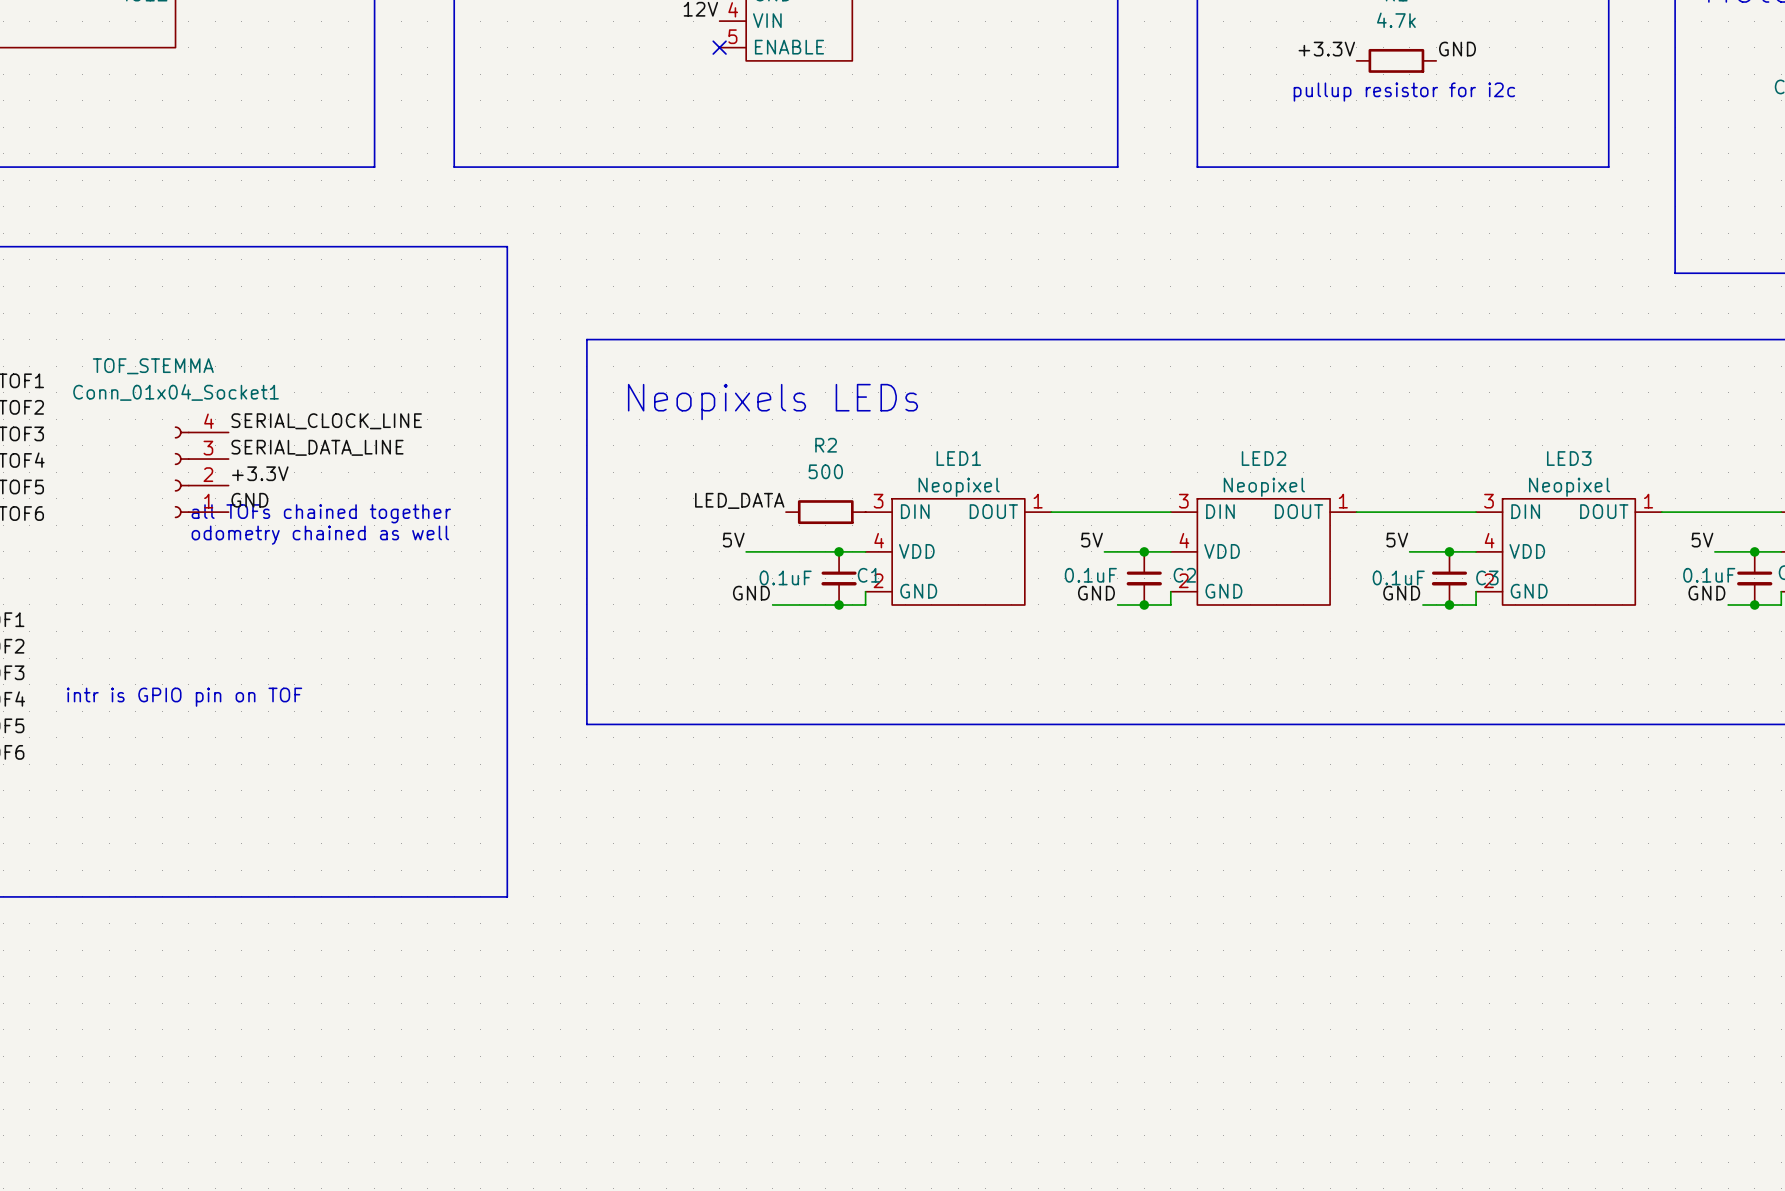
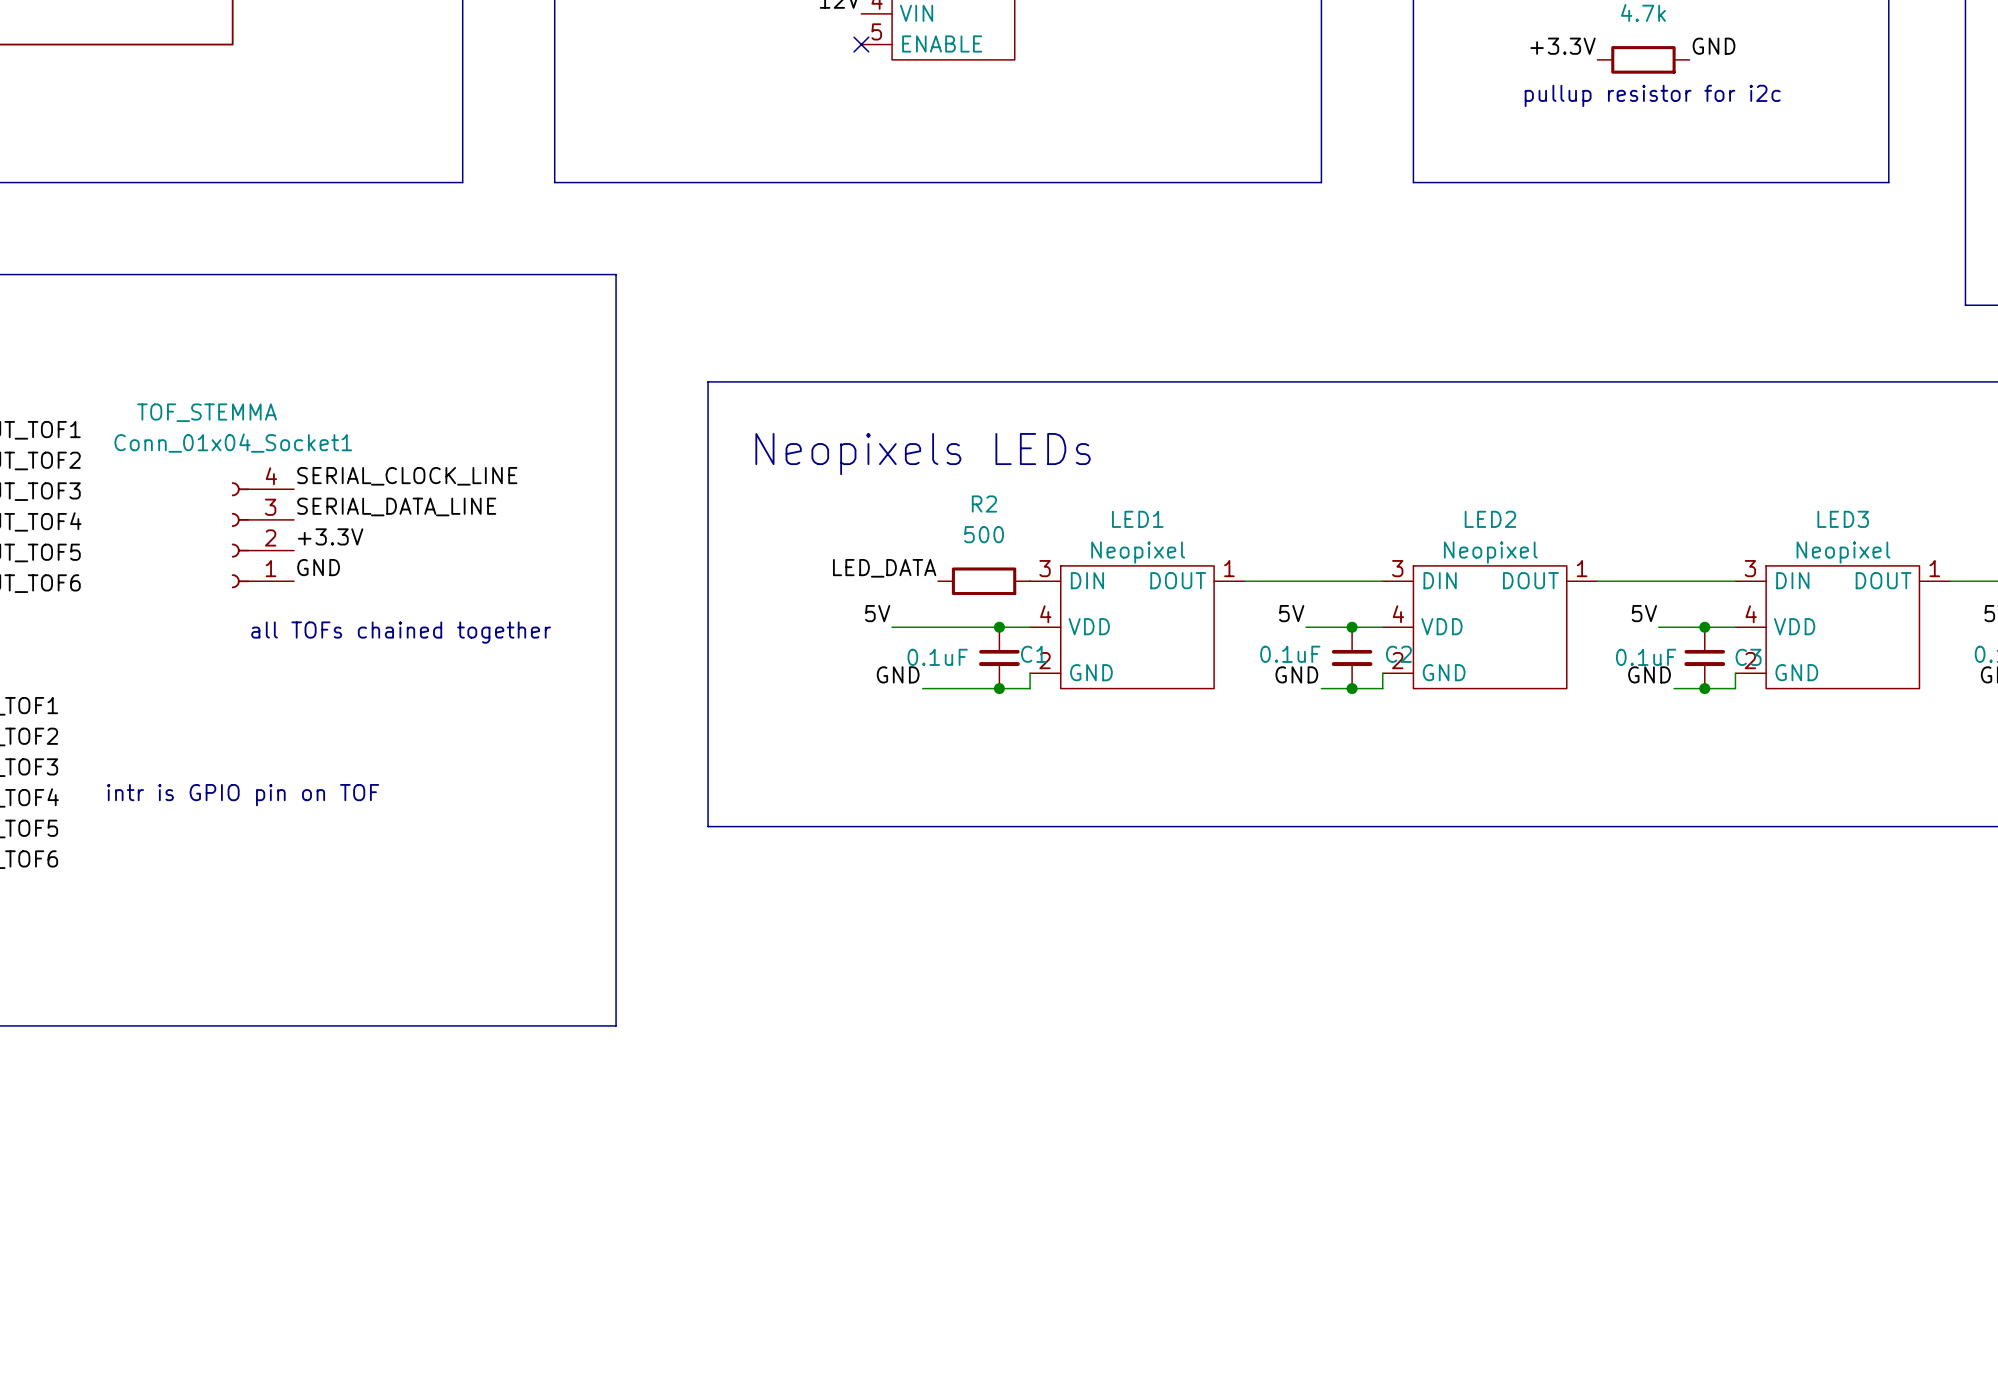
text position: all TOFs chained together (321, 513) -> all TOFs chained together (401, 632)
text: odometry chained as well (320, 535) -> none

